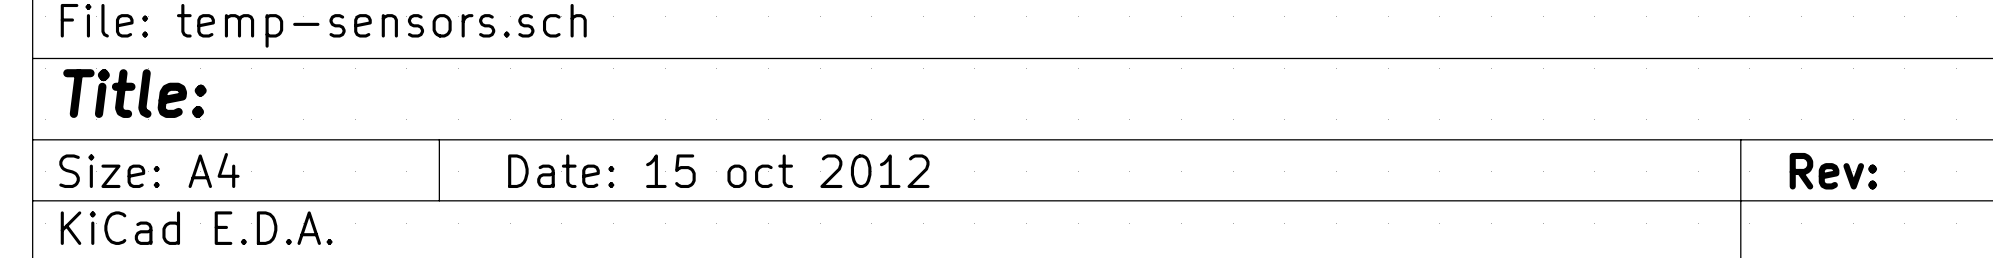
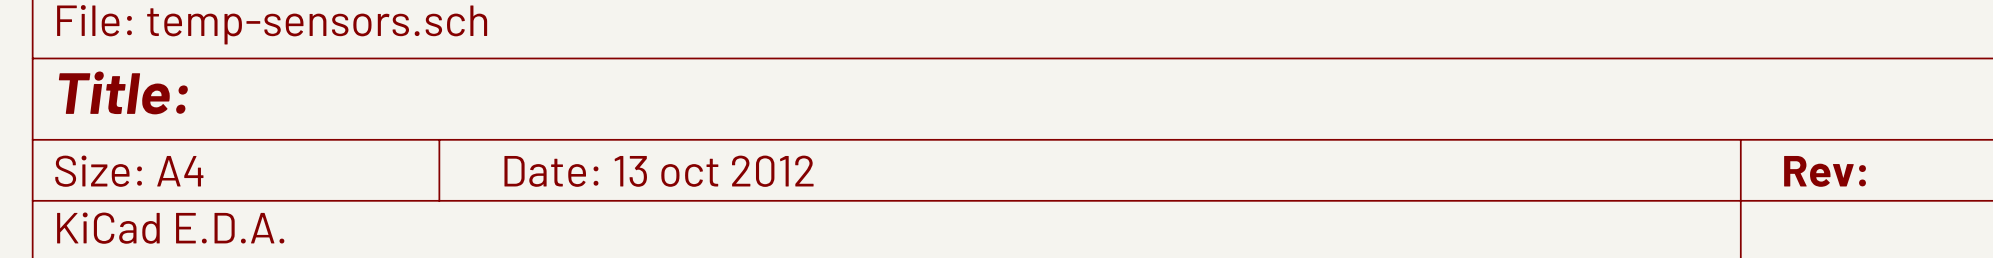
title block: Date: 15 oct 2012 (718, 171) -> Date: 13 oct 2012 (659, 171)

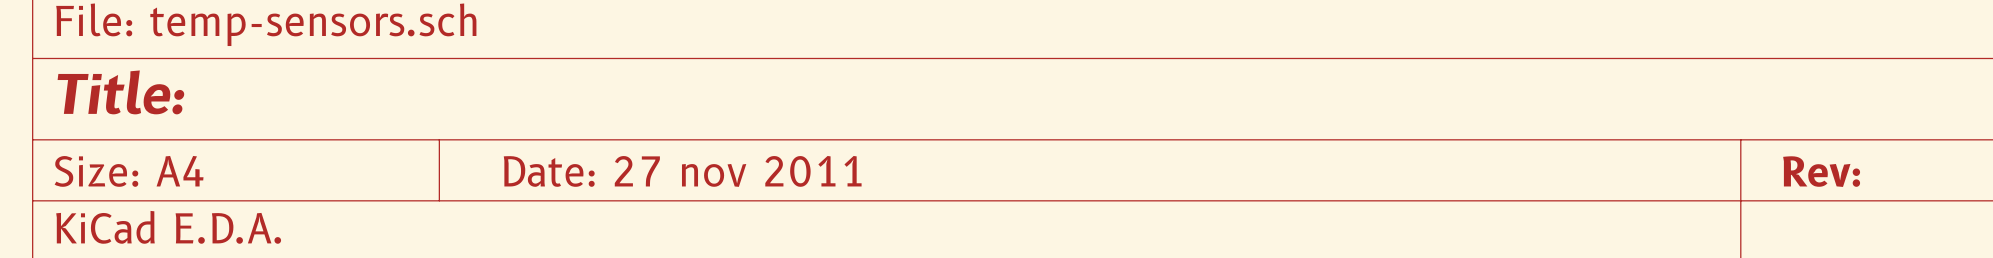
title block: Date: 13 oct 2012 (659, 171) -> Date: 27 nov 2011 (682, 171)

